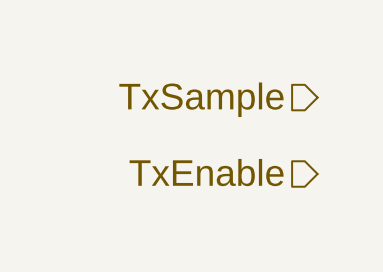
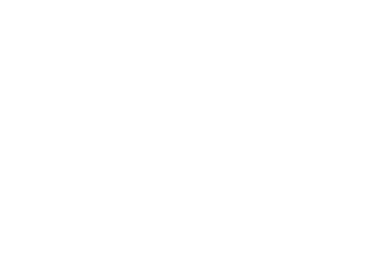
hierarchical label: TxSample (201, 99) -> none
hierarchical label: TxEnable (206, 172) -> none

